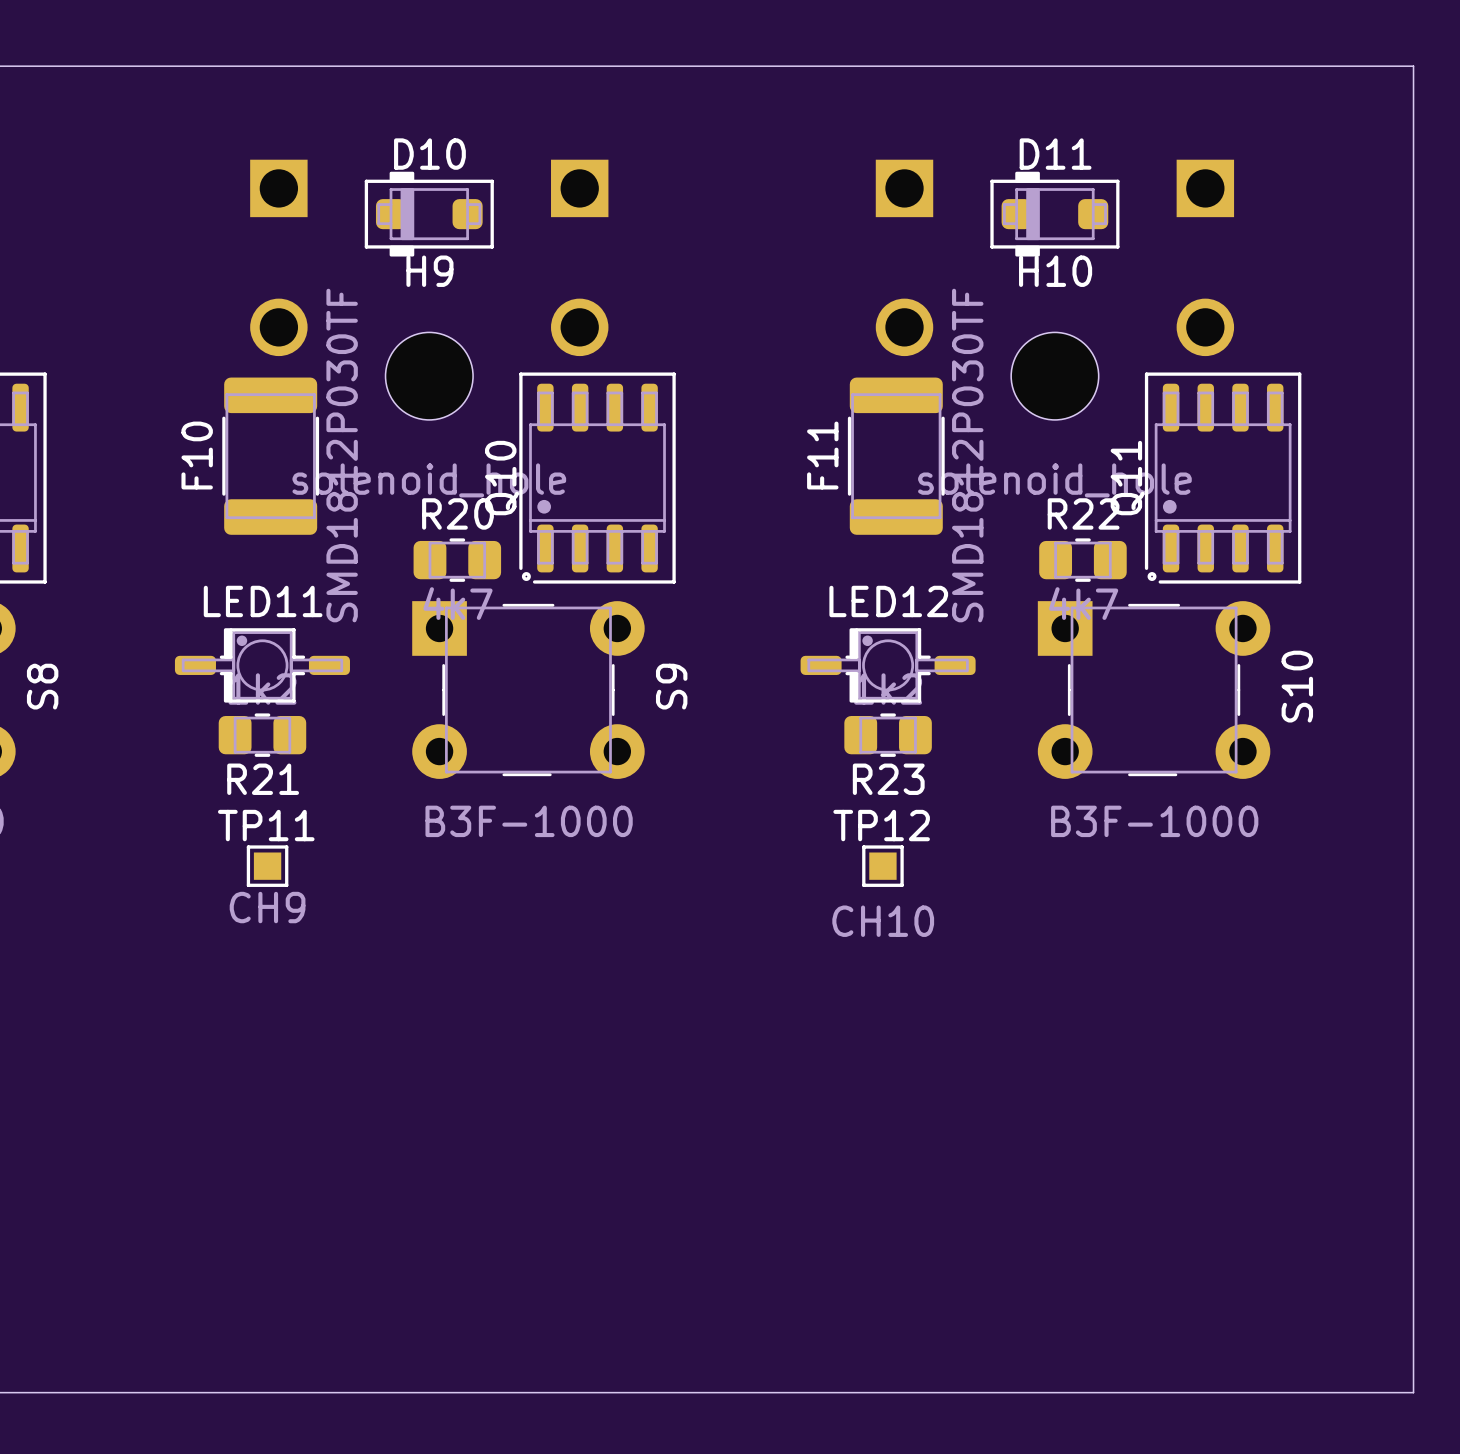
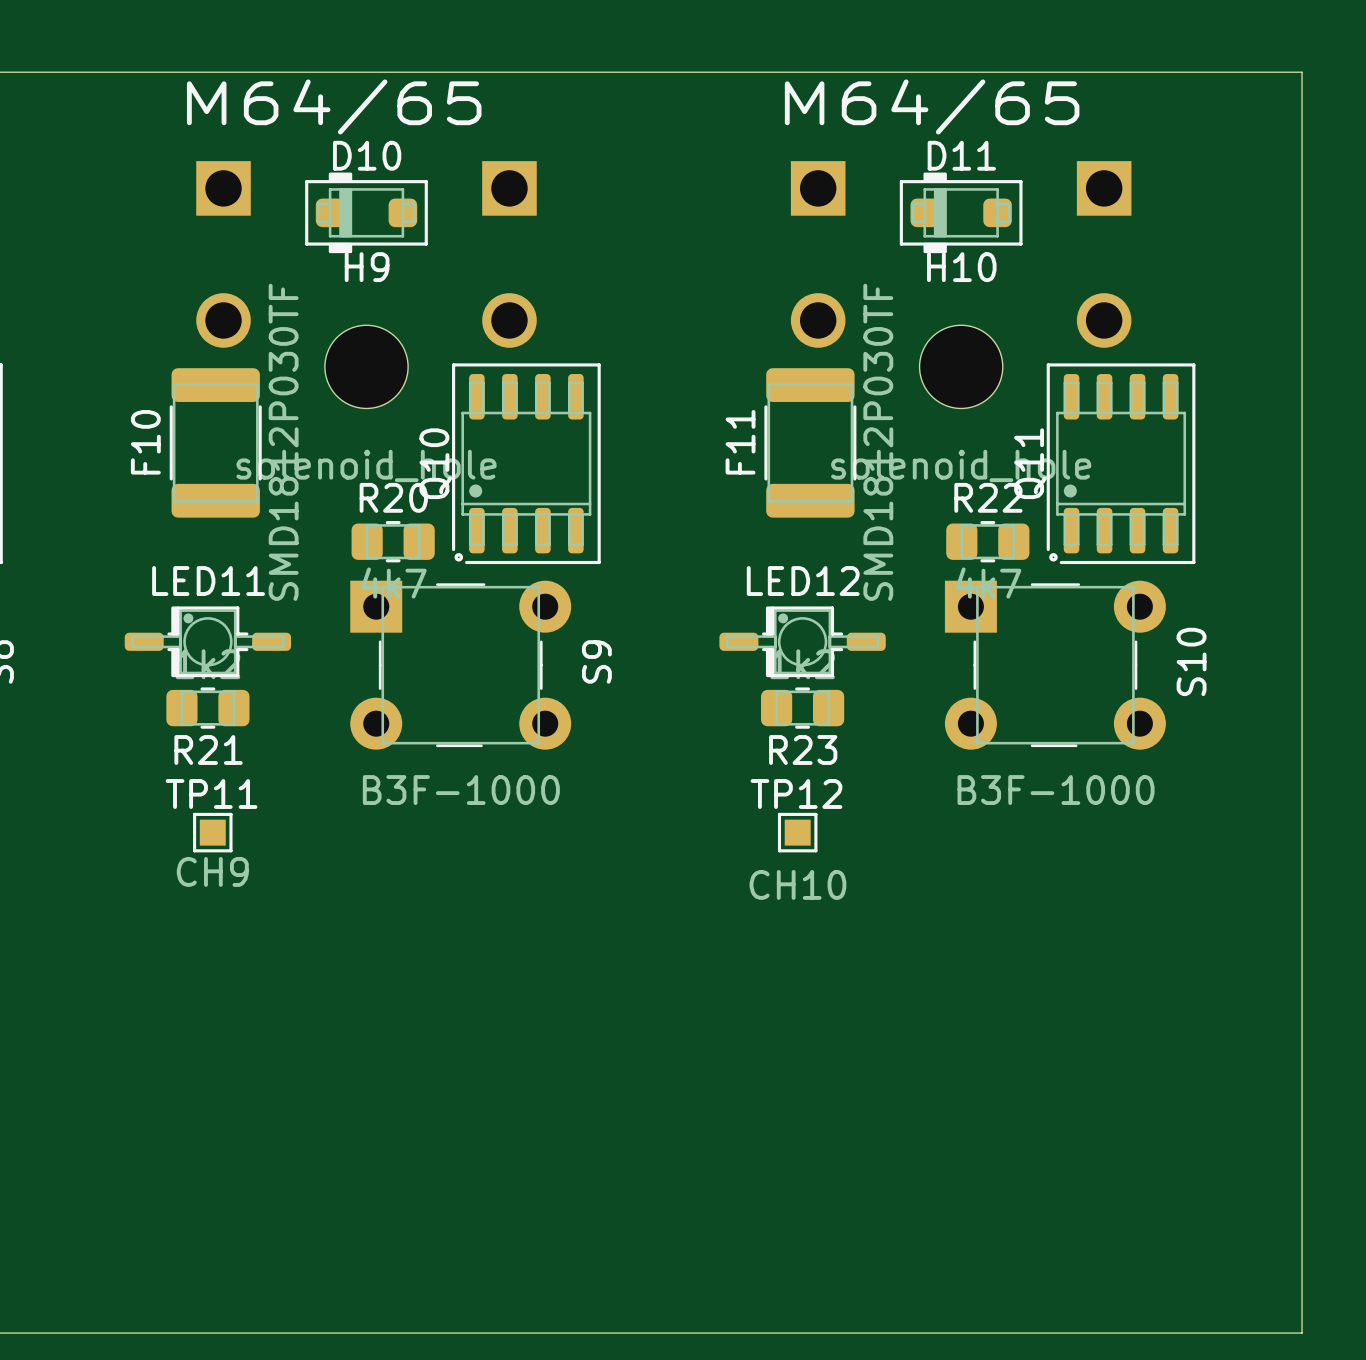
text: none -> M64/65 (334, 106)
text: none -> M64/65 (932, 106)

